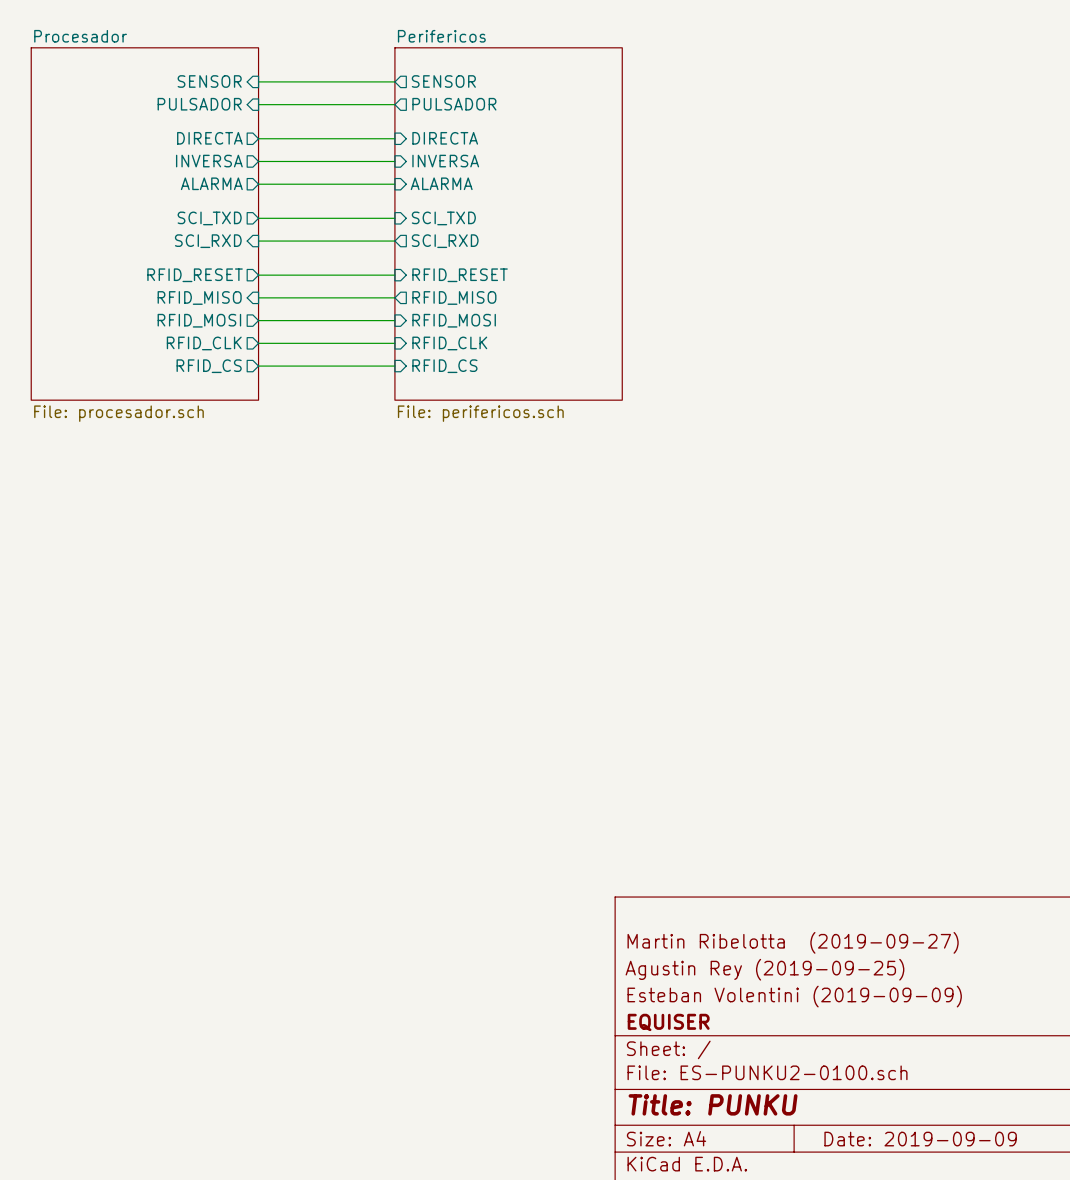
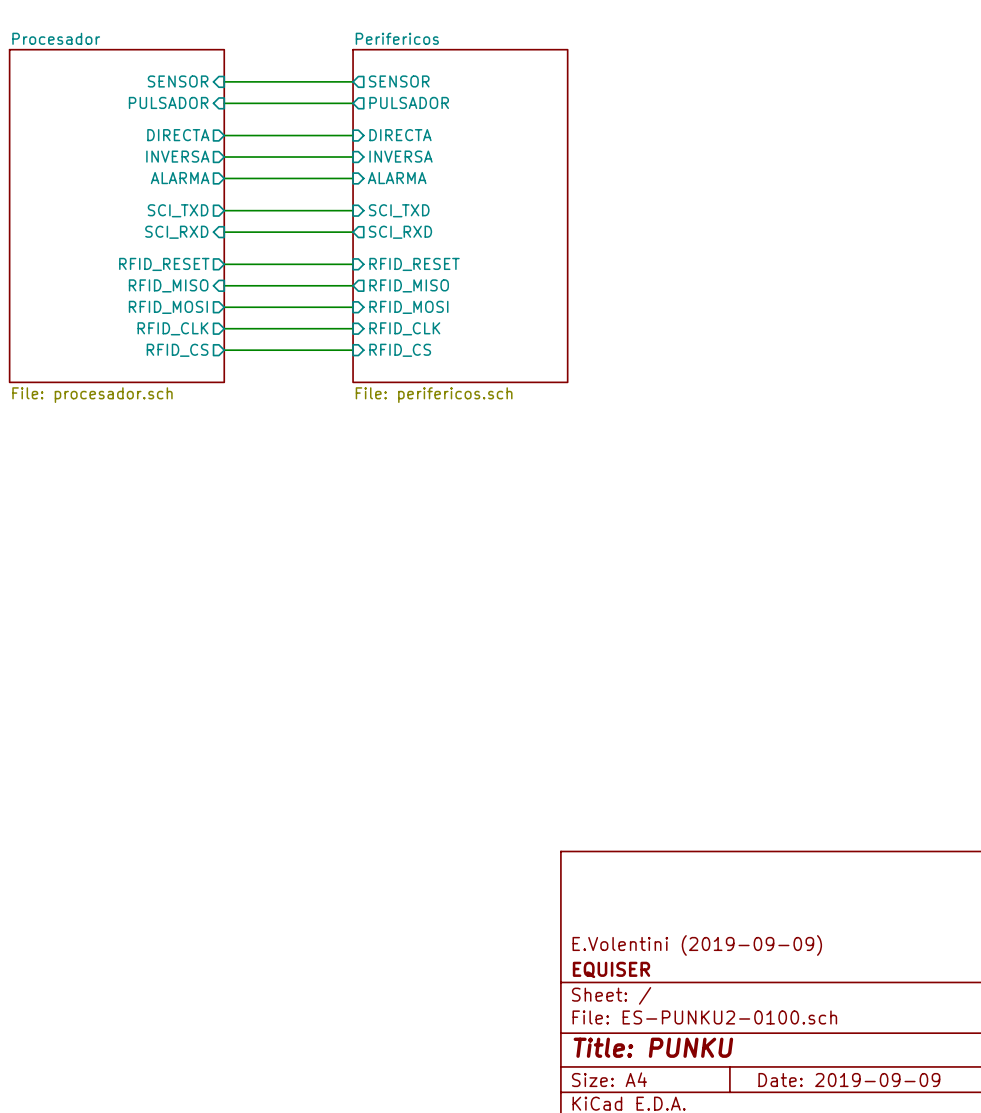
title block: Martin Ribelotta (2019-09-27) (793, 942) -> none
title block: Agustin Rey (2019-09-25) (764, 969) -> none
title block: Esteban Volentini (2019-09-09) (794, 996) -> E.Volentini (2019-09-09) (697, 945)

